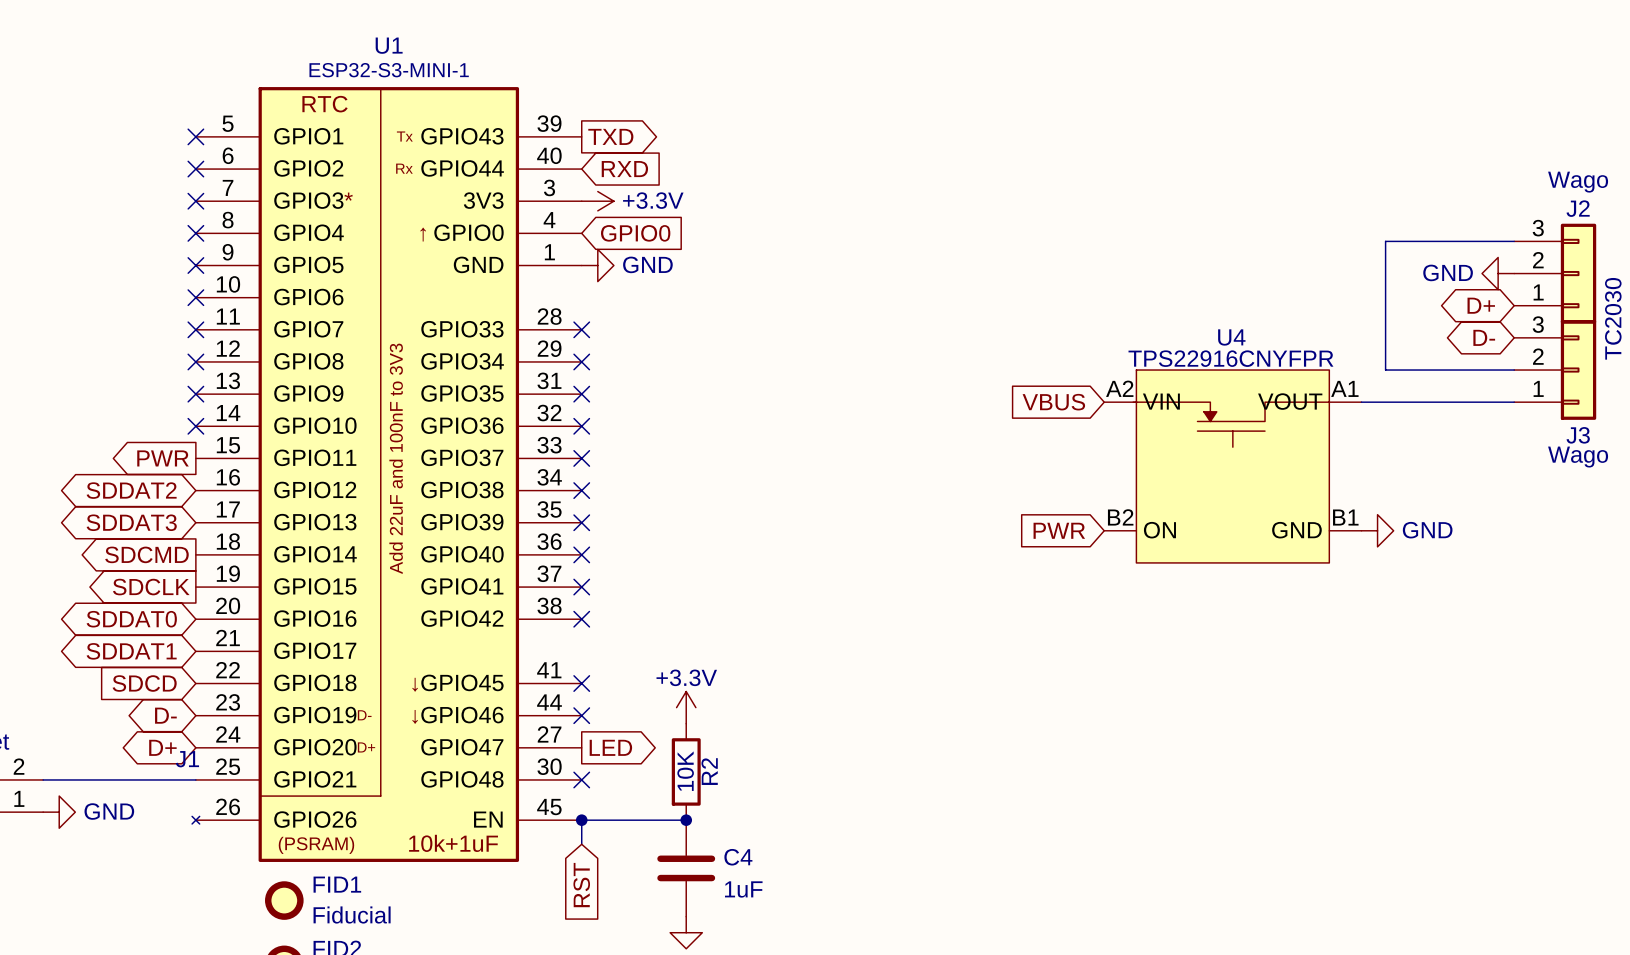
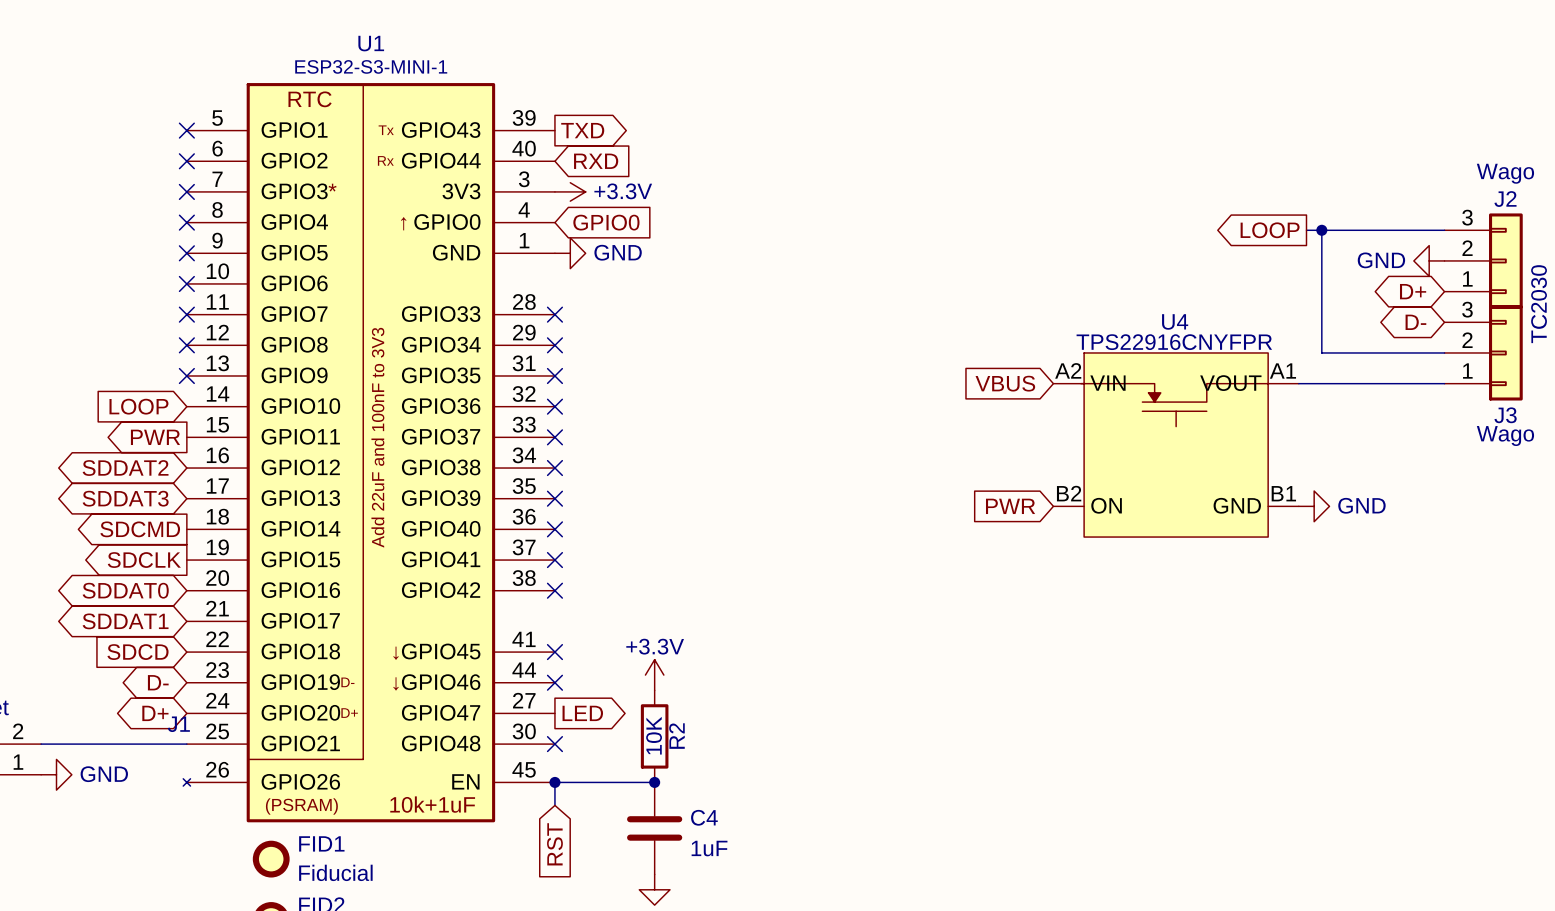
global label: none -> LOOP (1270, 230)
wire: none -> (1306, 230) (1321, 230)
junction: none -> (1321, 230)
global label: none -> LOOP (138, 406)
no-connect mark: (195, 426) -> none

